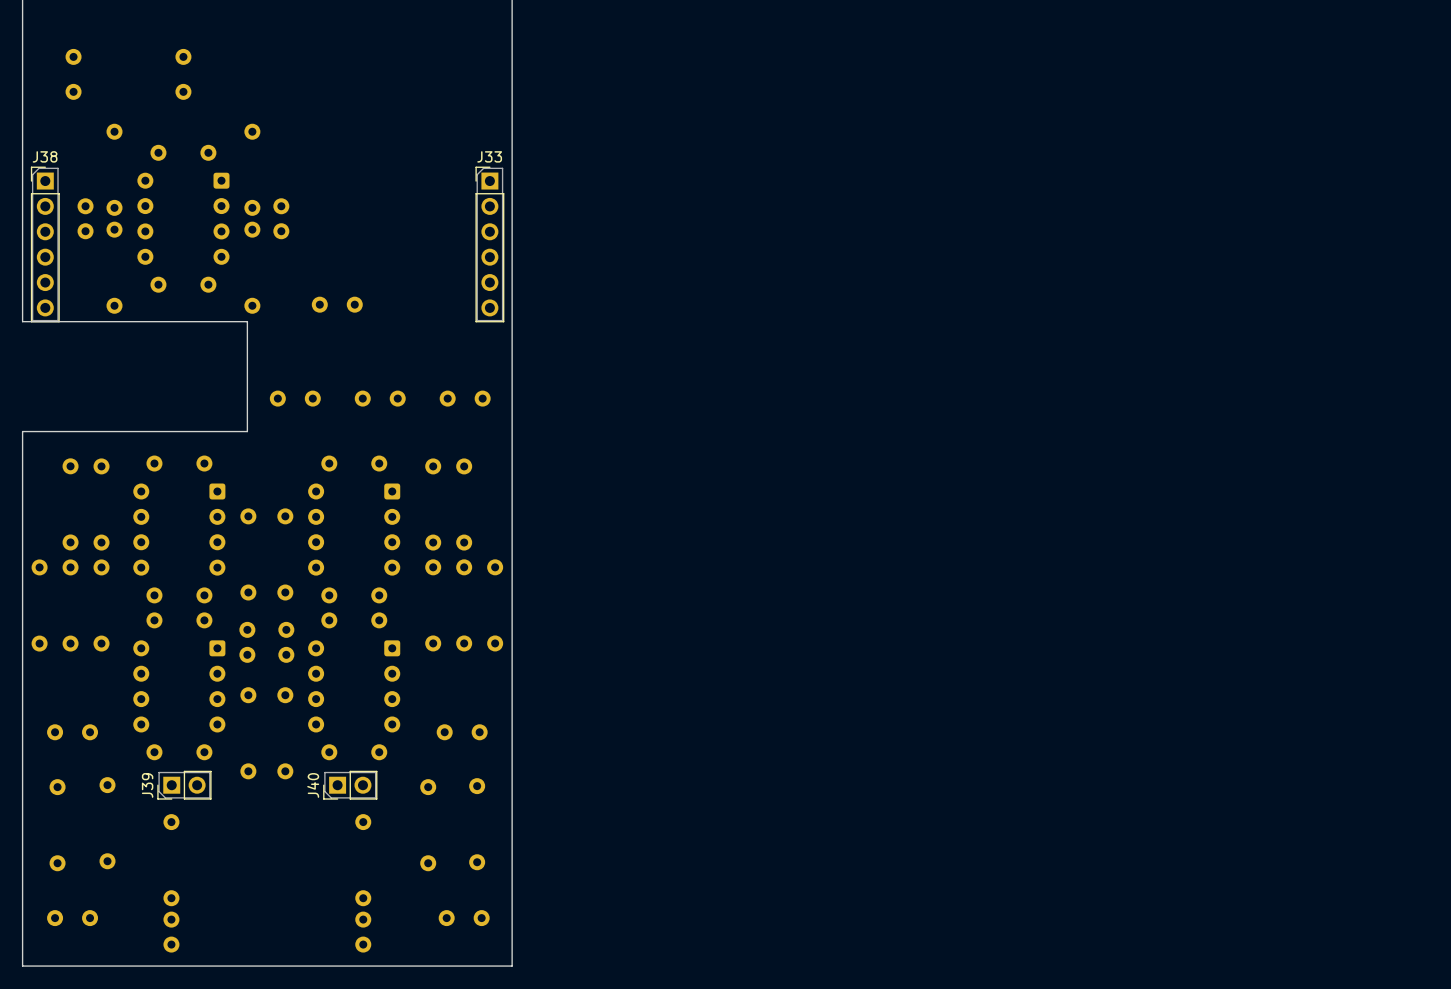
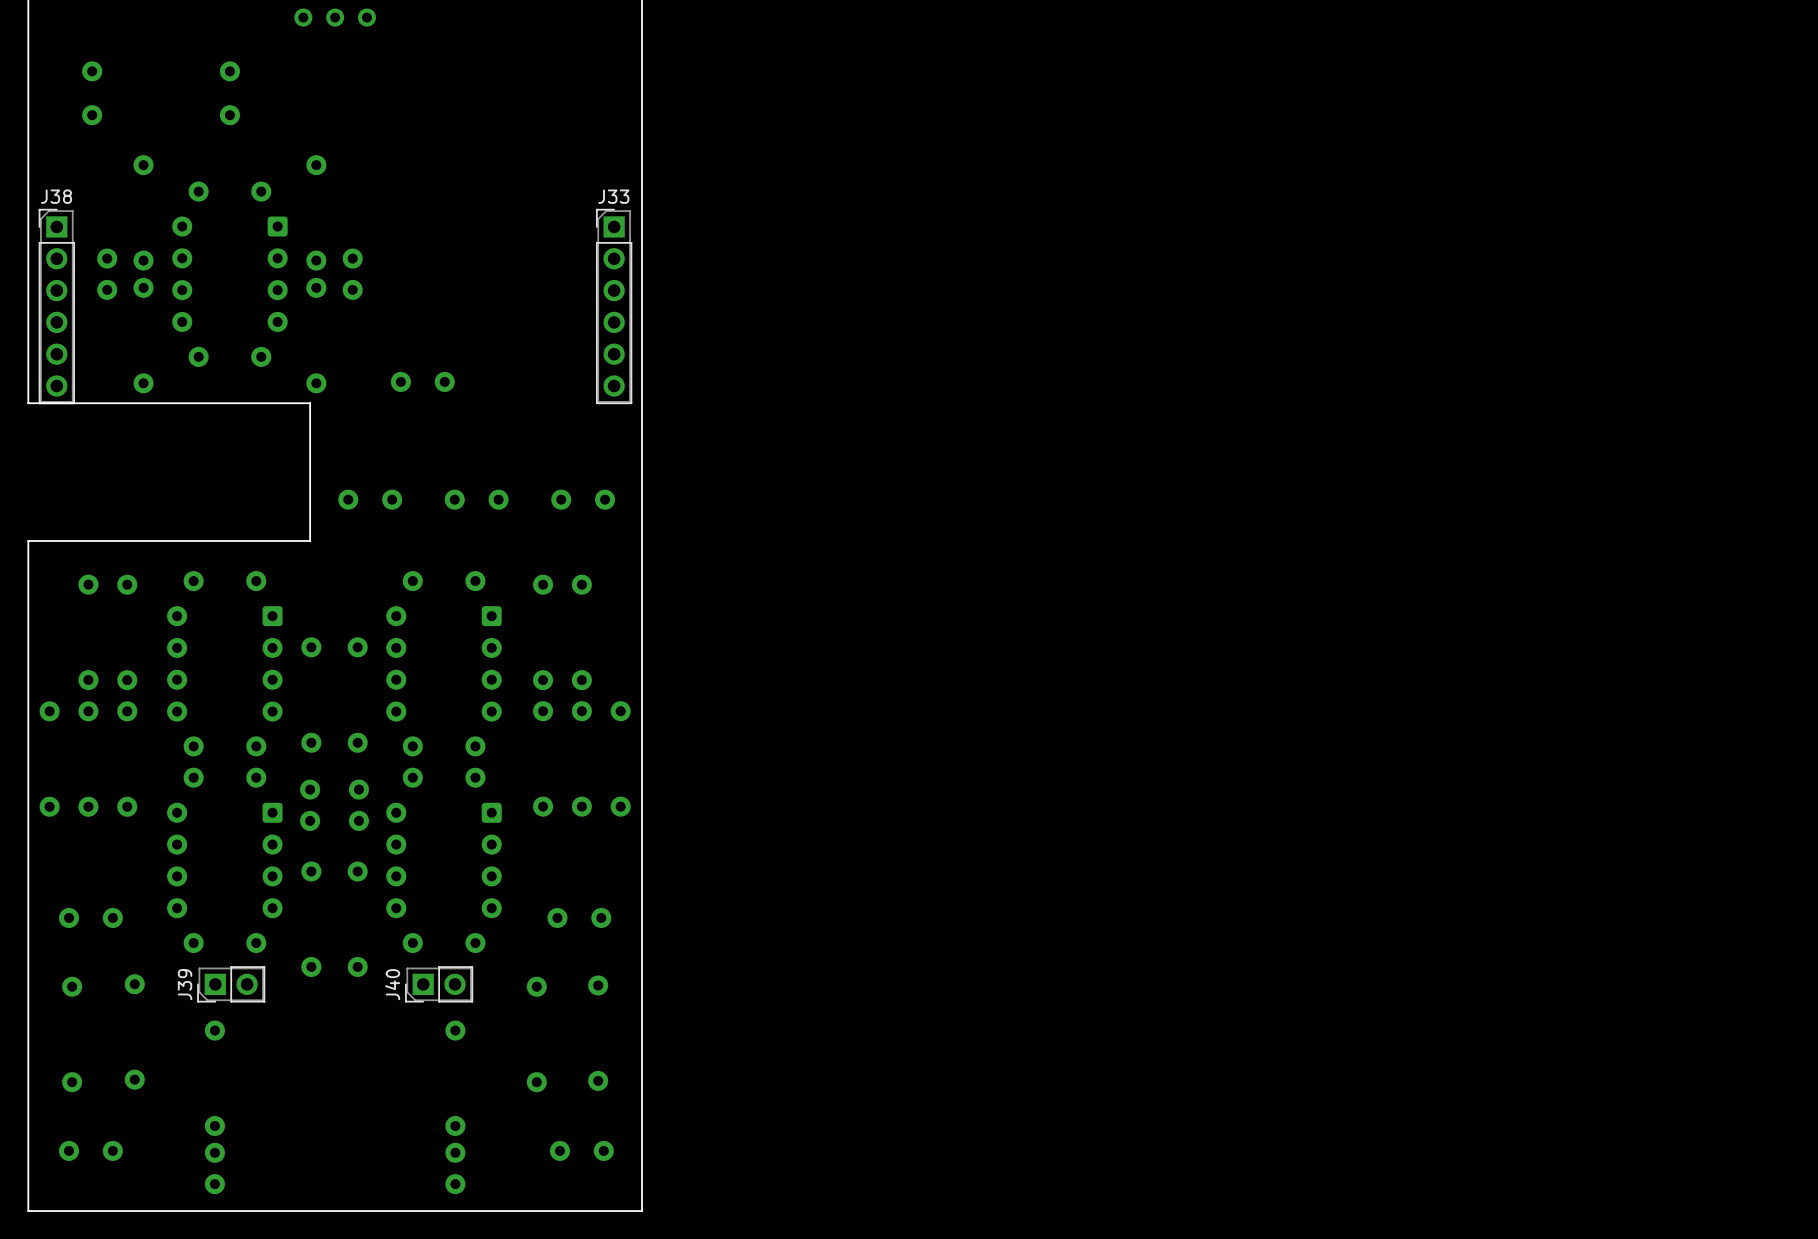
part: none -> (335, 17)

